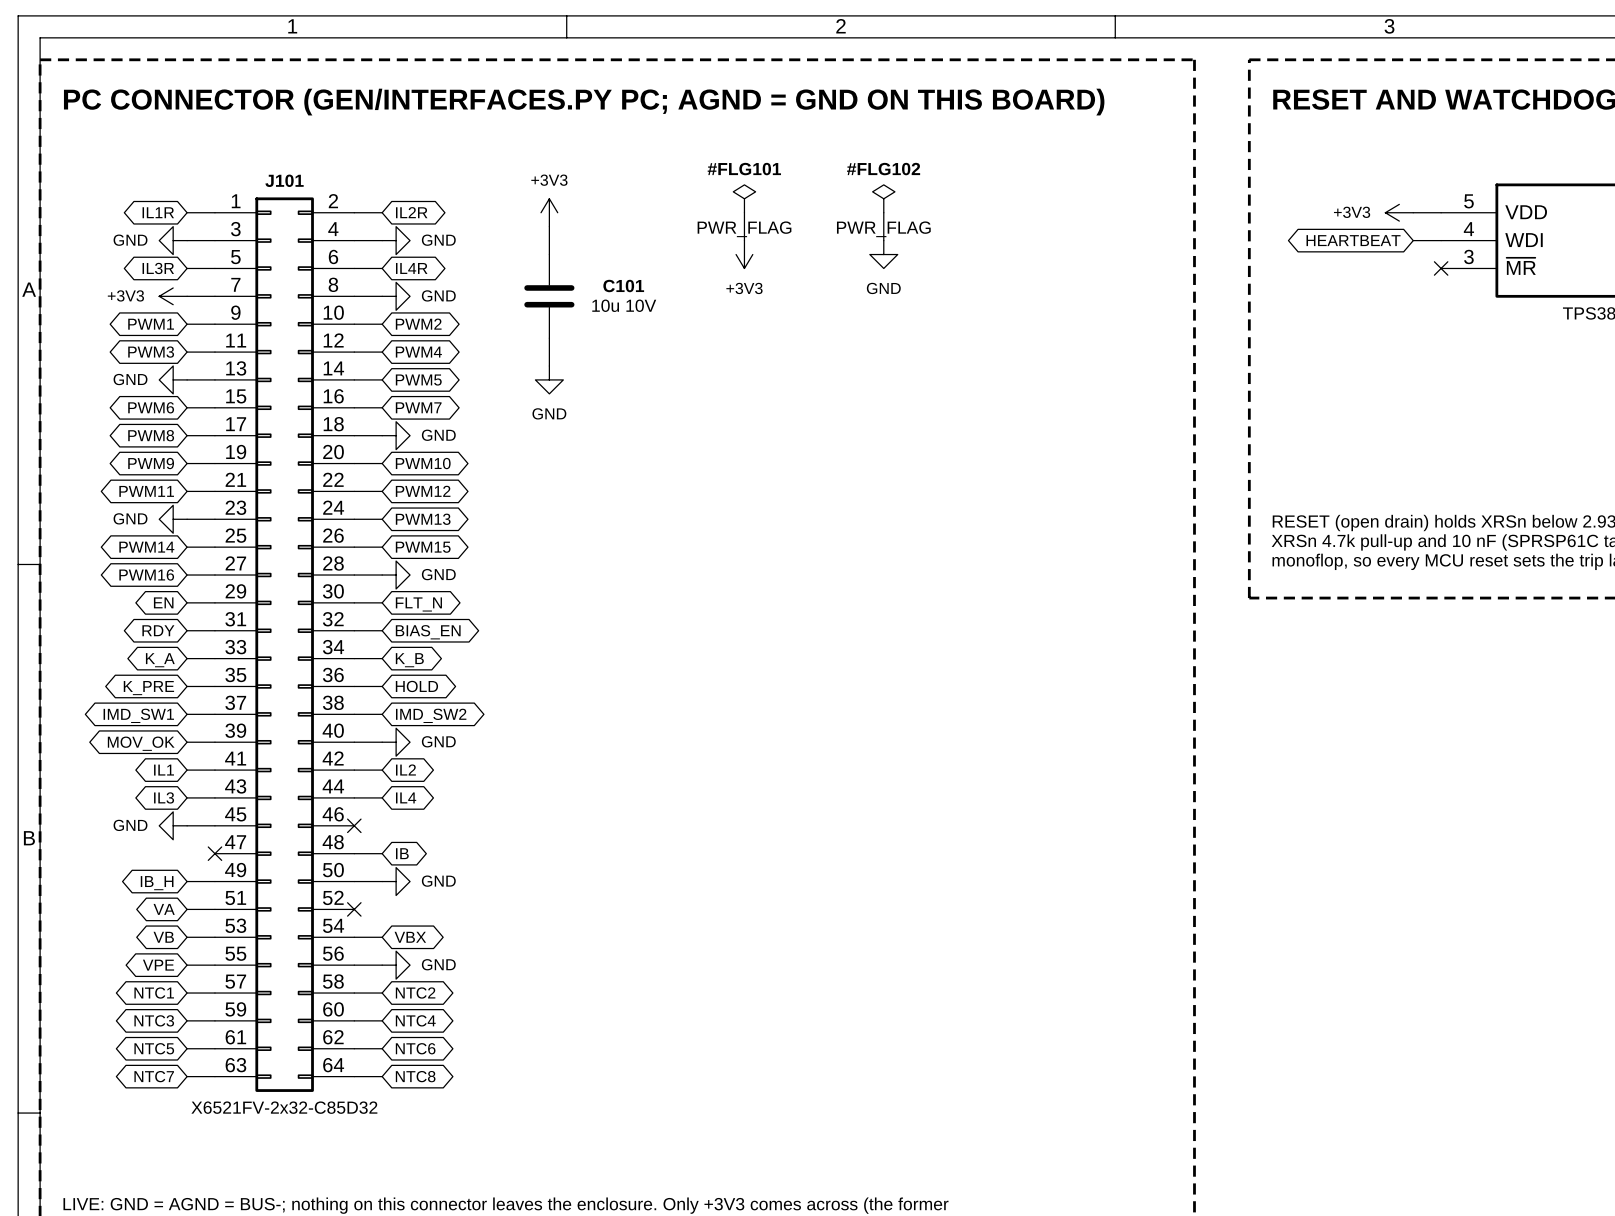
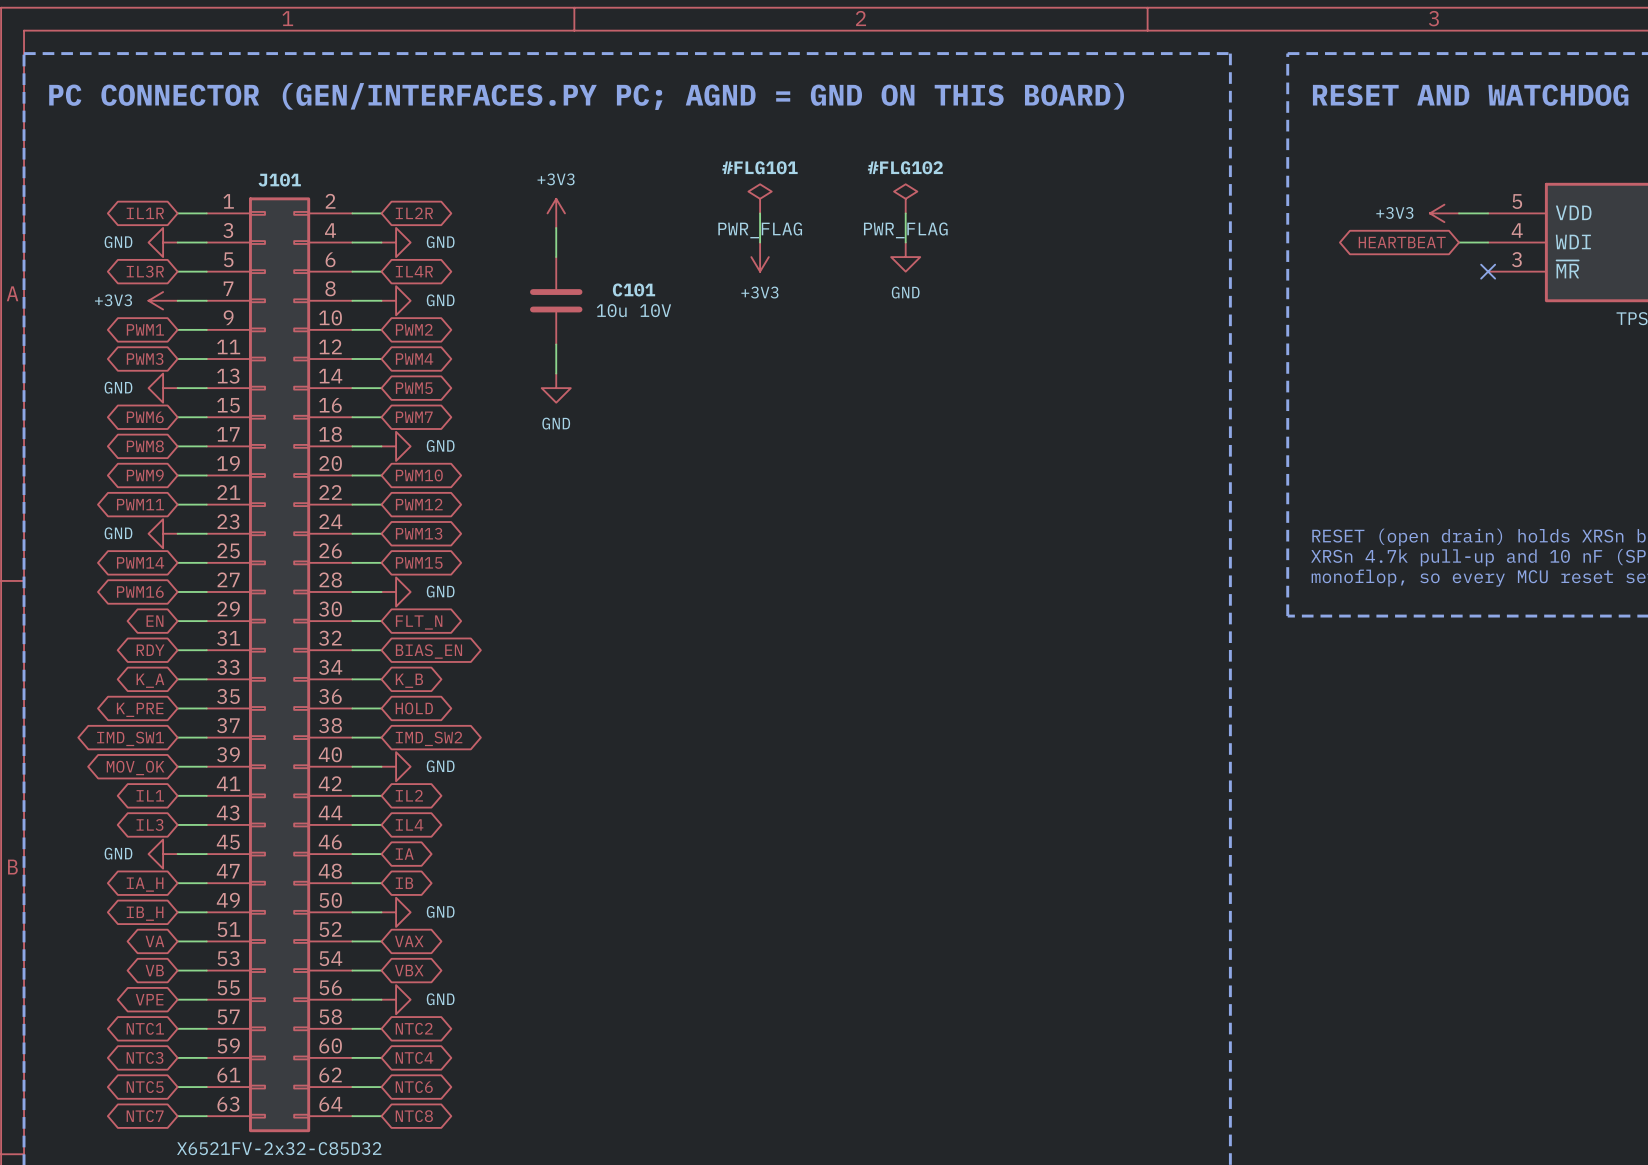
wire: none -> (352, 854) (381, 854)
no-connect mark: (354, 825) -> none
global label: none -> IA (404, 854)
wire: none -> (177, 883) (206, 883)
no-connect mark: (214, 853) -> none
global label: none -> IA_H (145, 884)
wire: none -> (352, 941) (381, 941)
no-connect mark: (354, 909) -> none
global label: none -> VAX (409, 941)

